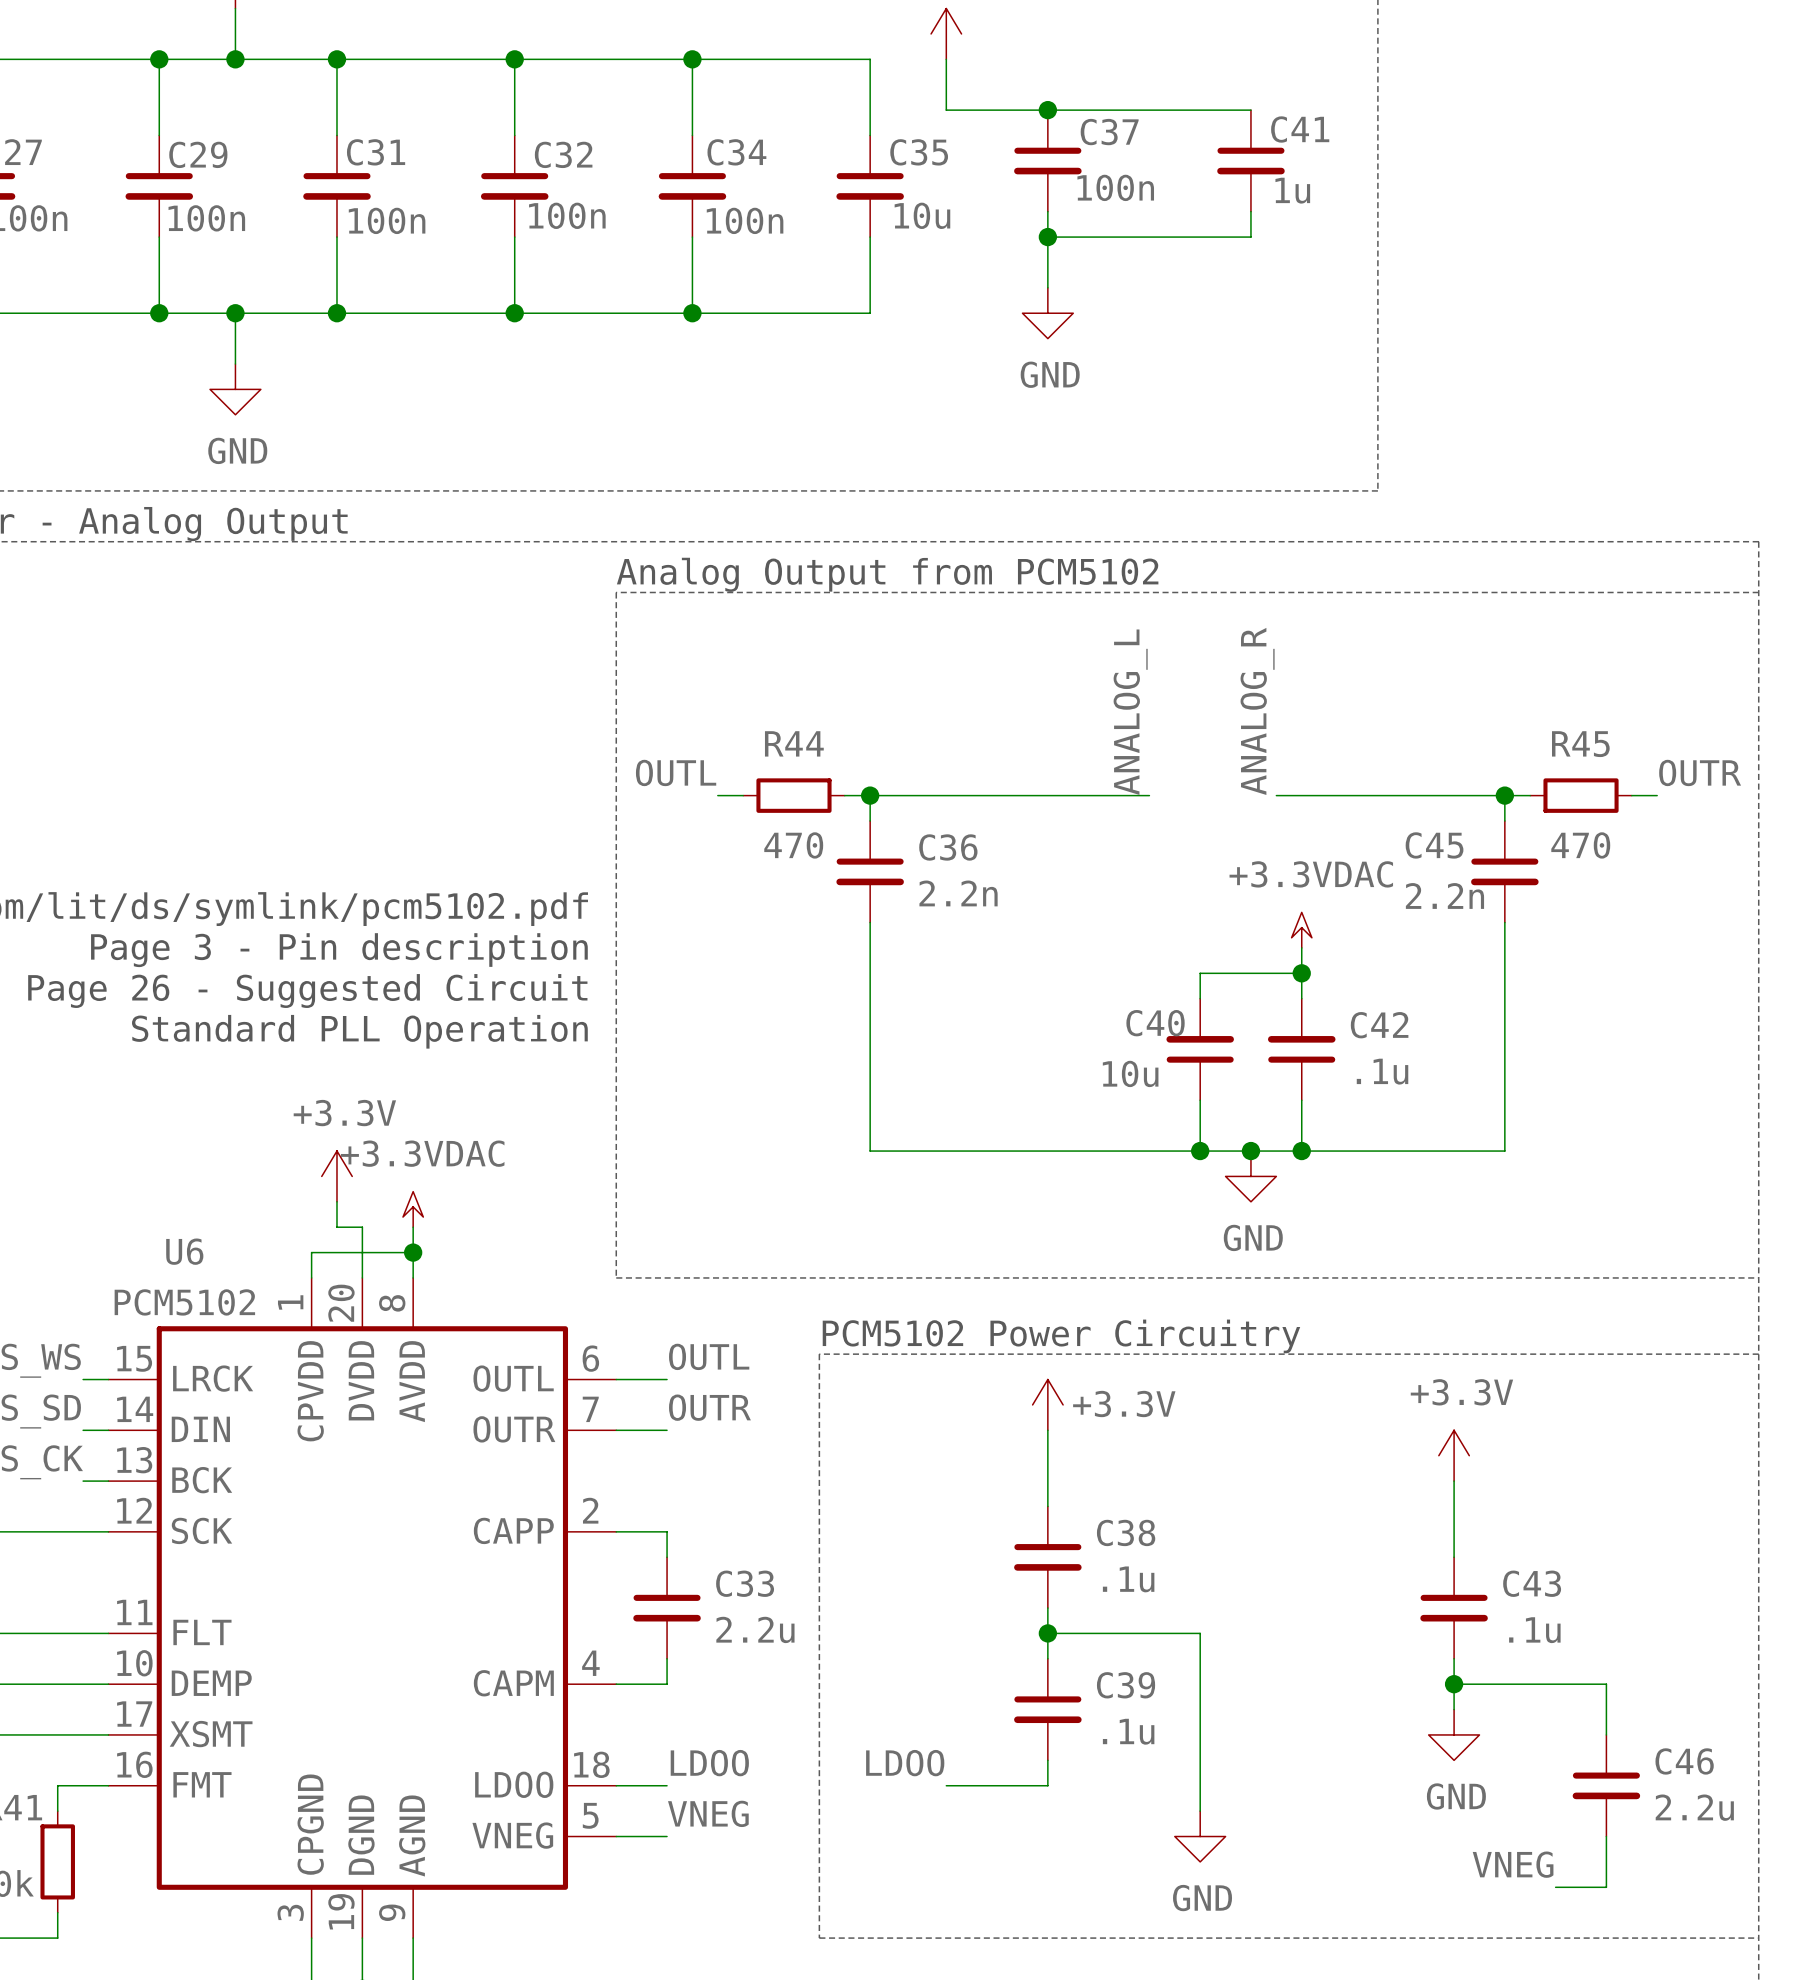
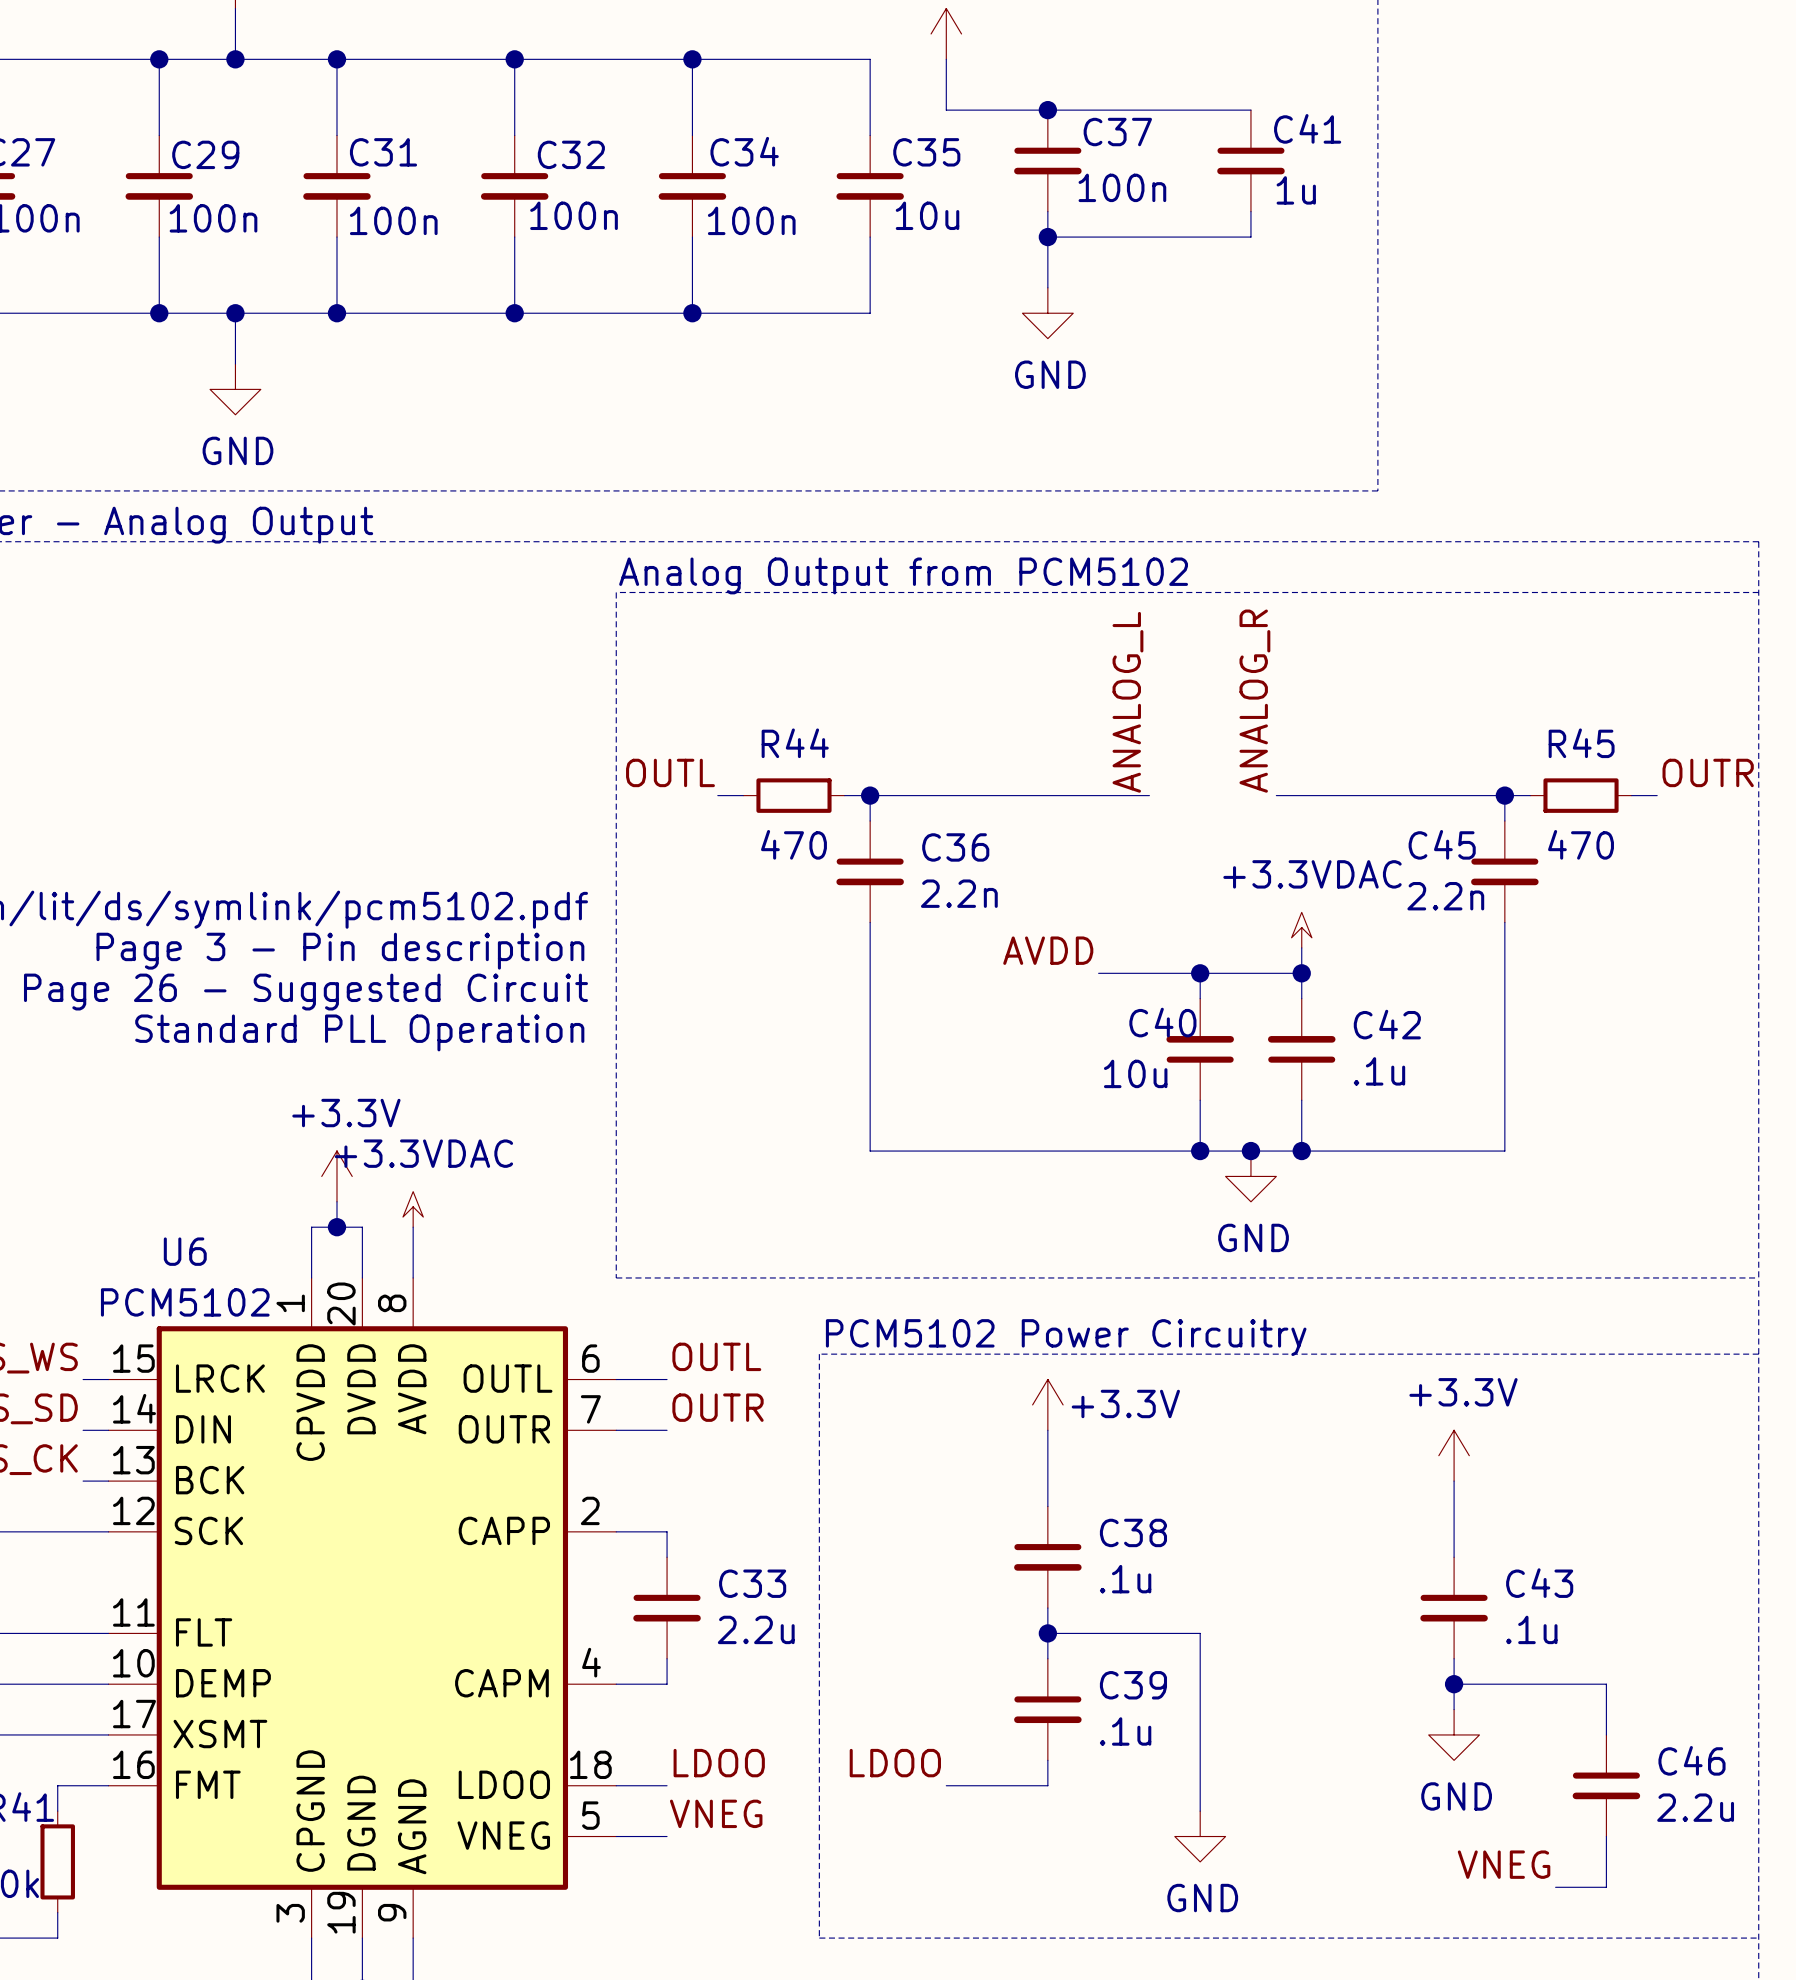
label: none -> AVDD (1048, 950)
wire: none -> (1098, 973) (1200, 973)
junction: none -> (1200, 973)
wire: (311, 1252) (413, 1252) -> (311, 1252) (311, 1227) (336, 1227)
junction position: (413, 1252) -> (336, 1227)

